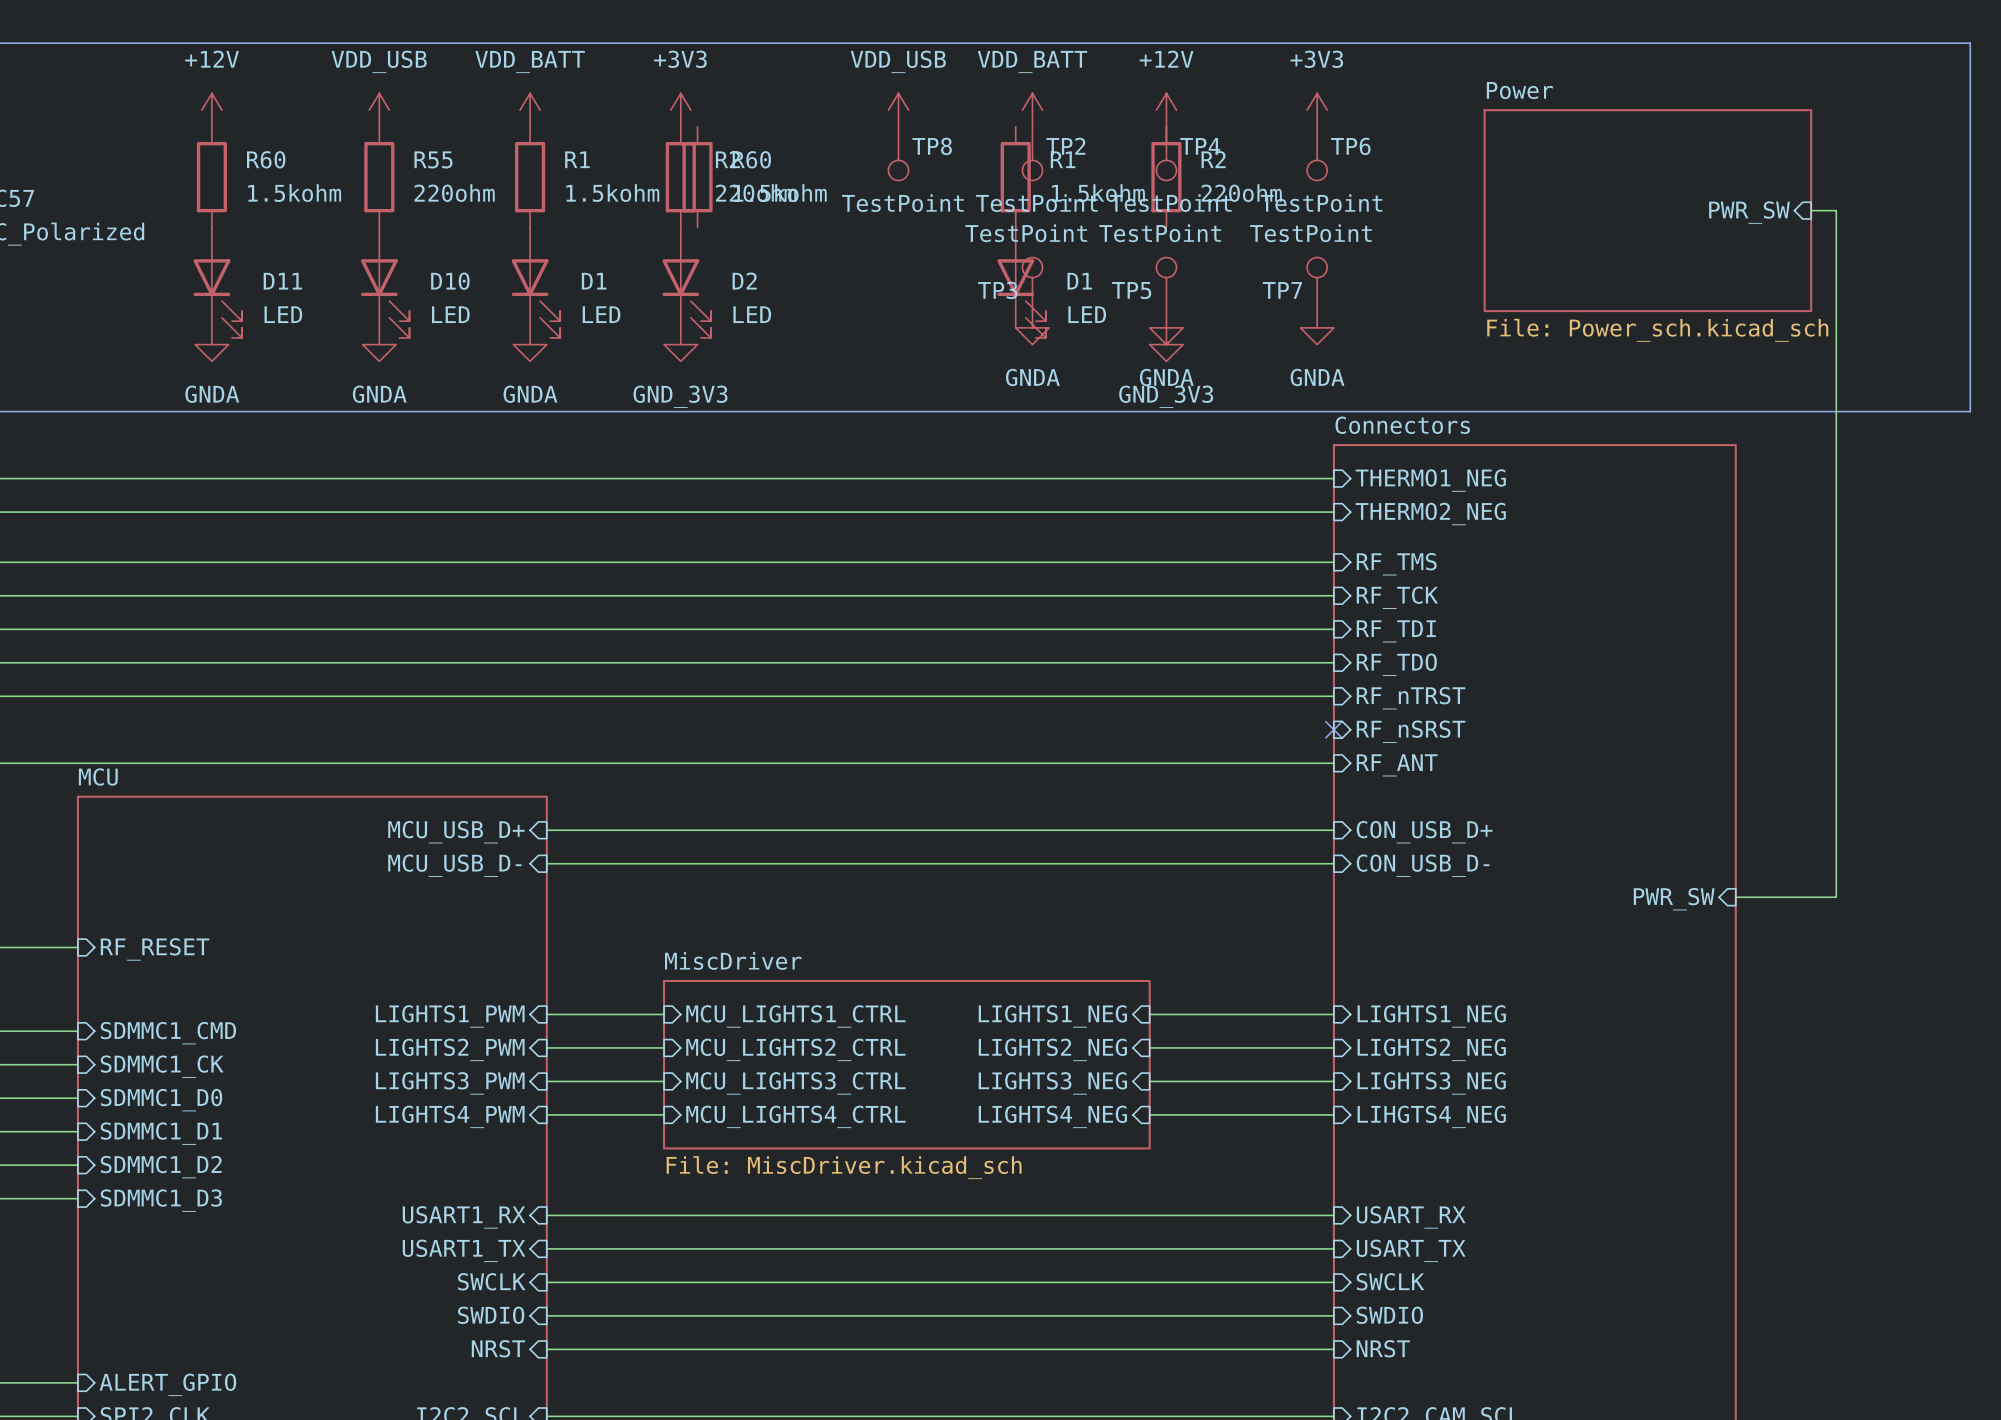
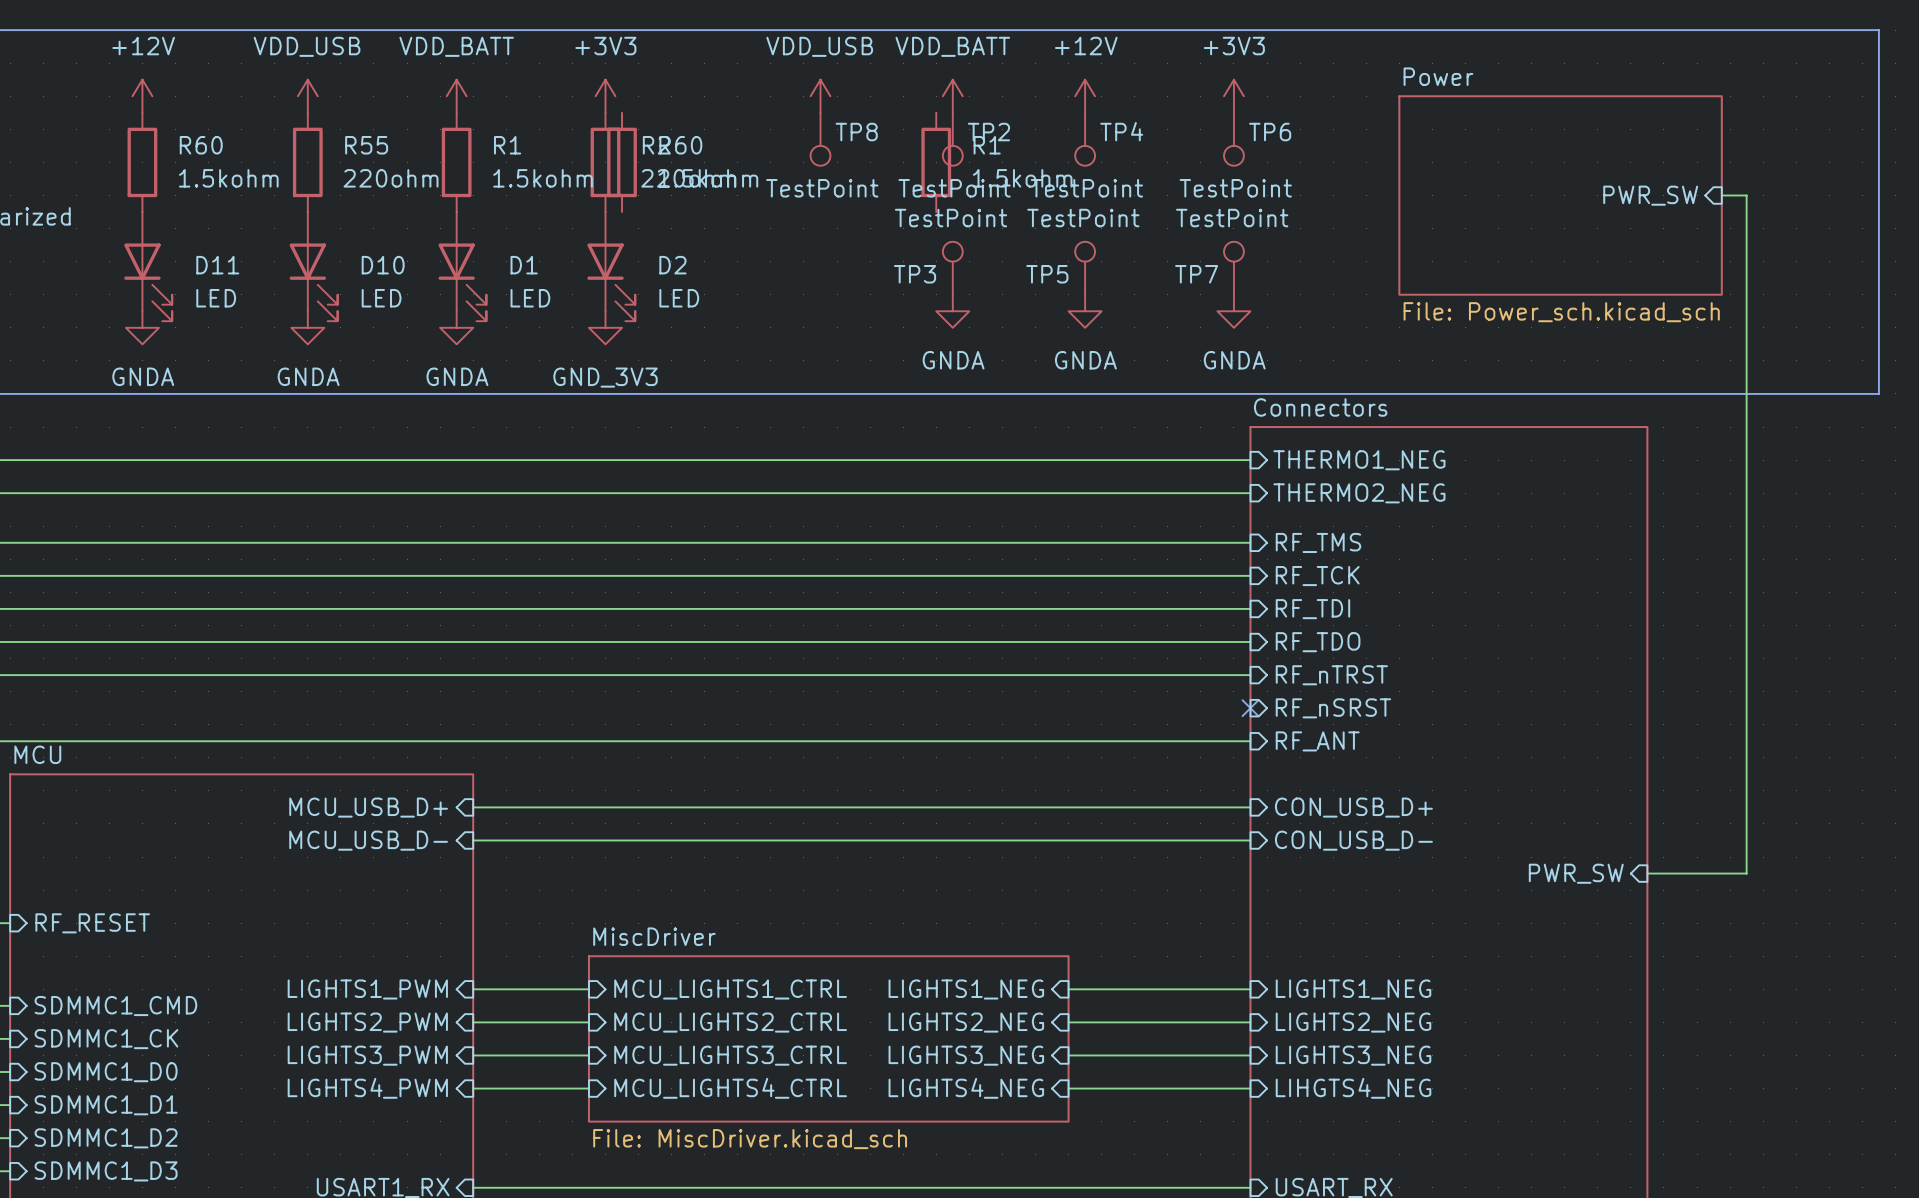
R2: 220ohm (1166, 177) -> none
D1: LED (1021, 282) -> none
power symbol: GND_3V3 (1166, 344) -> none

